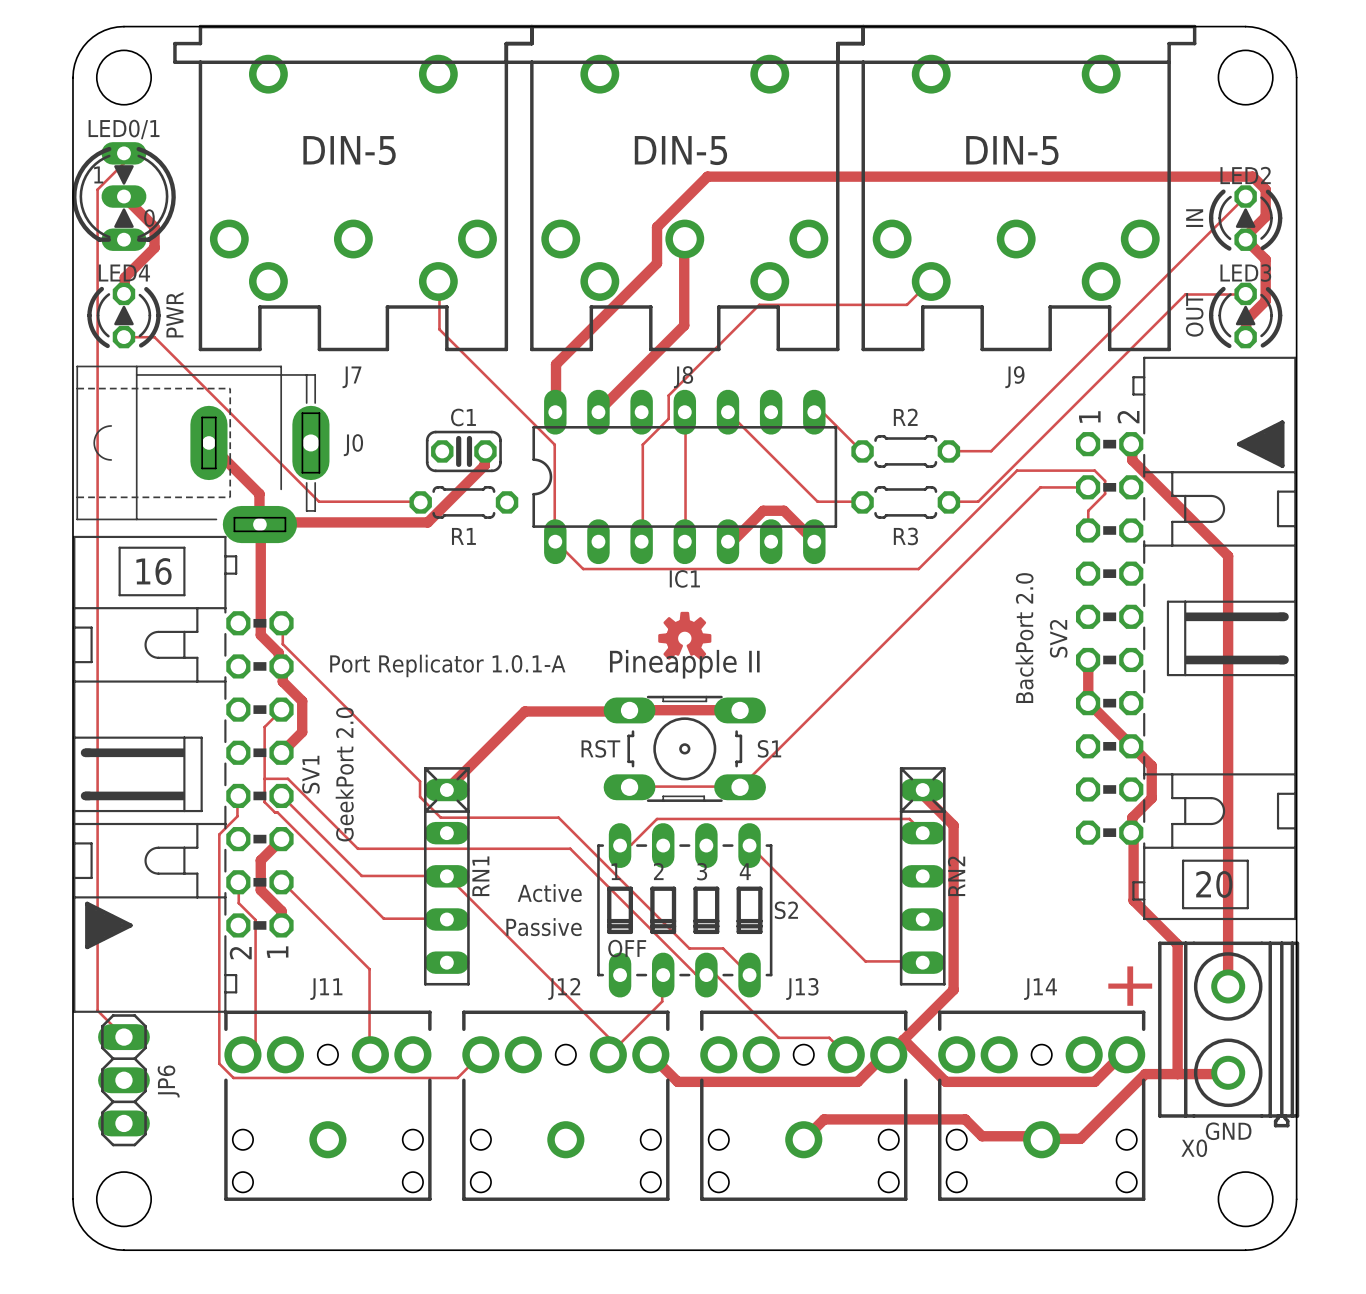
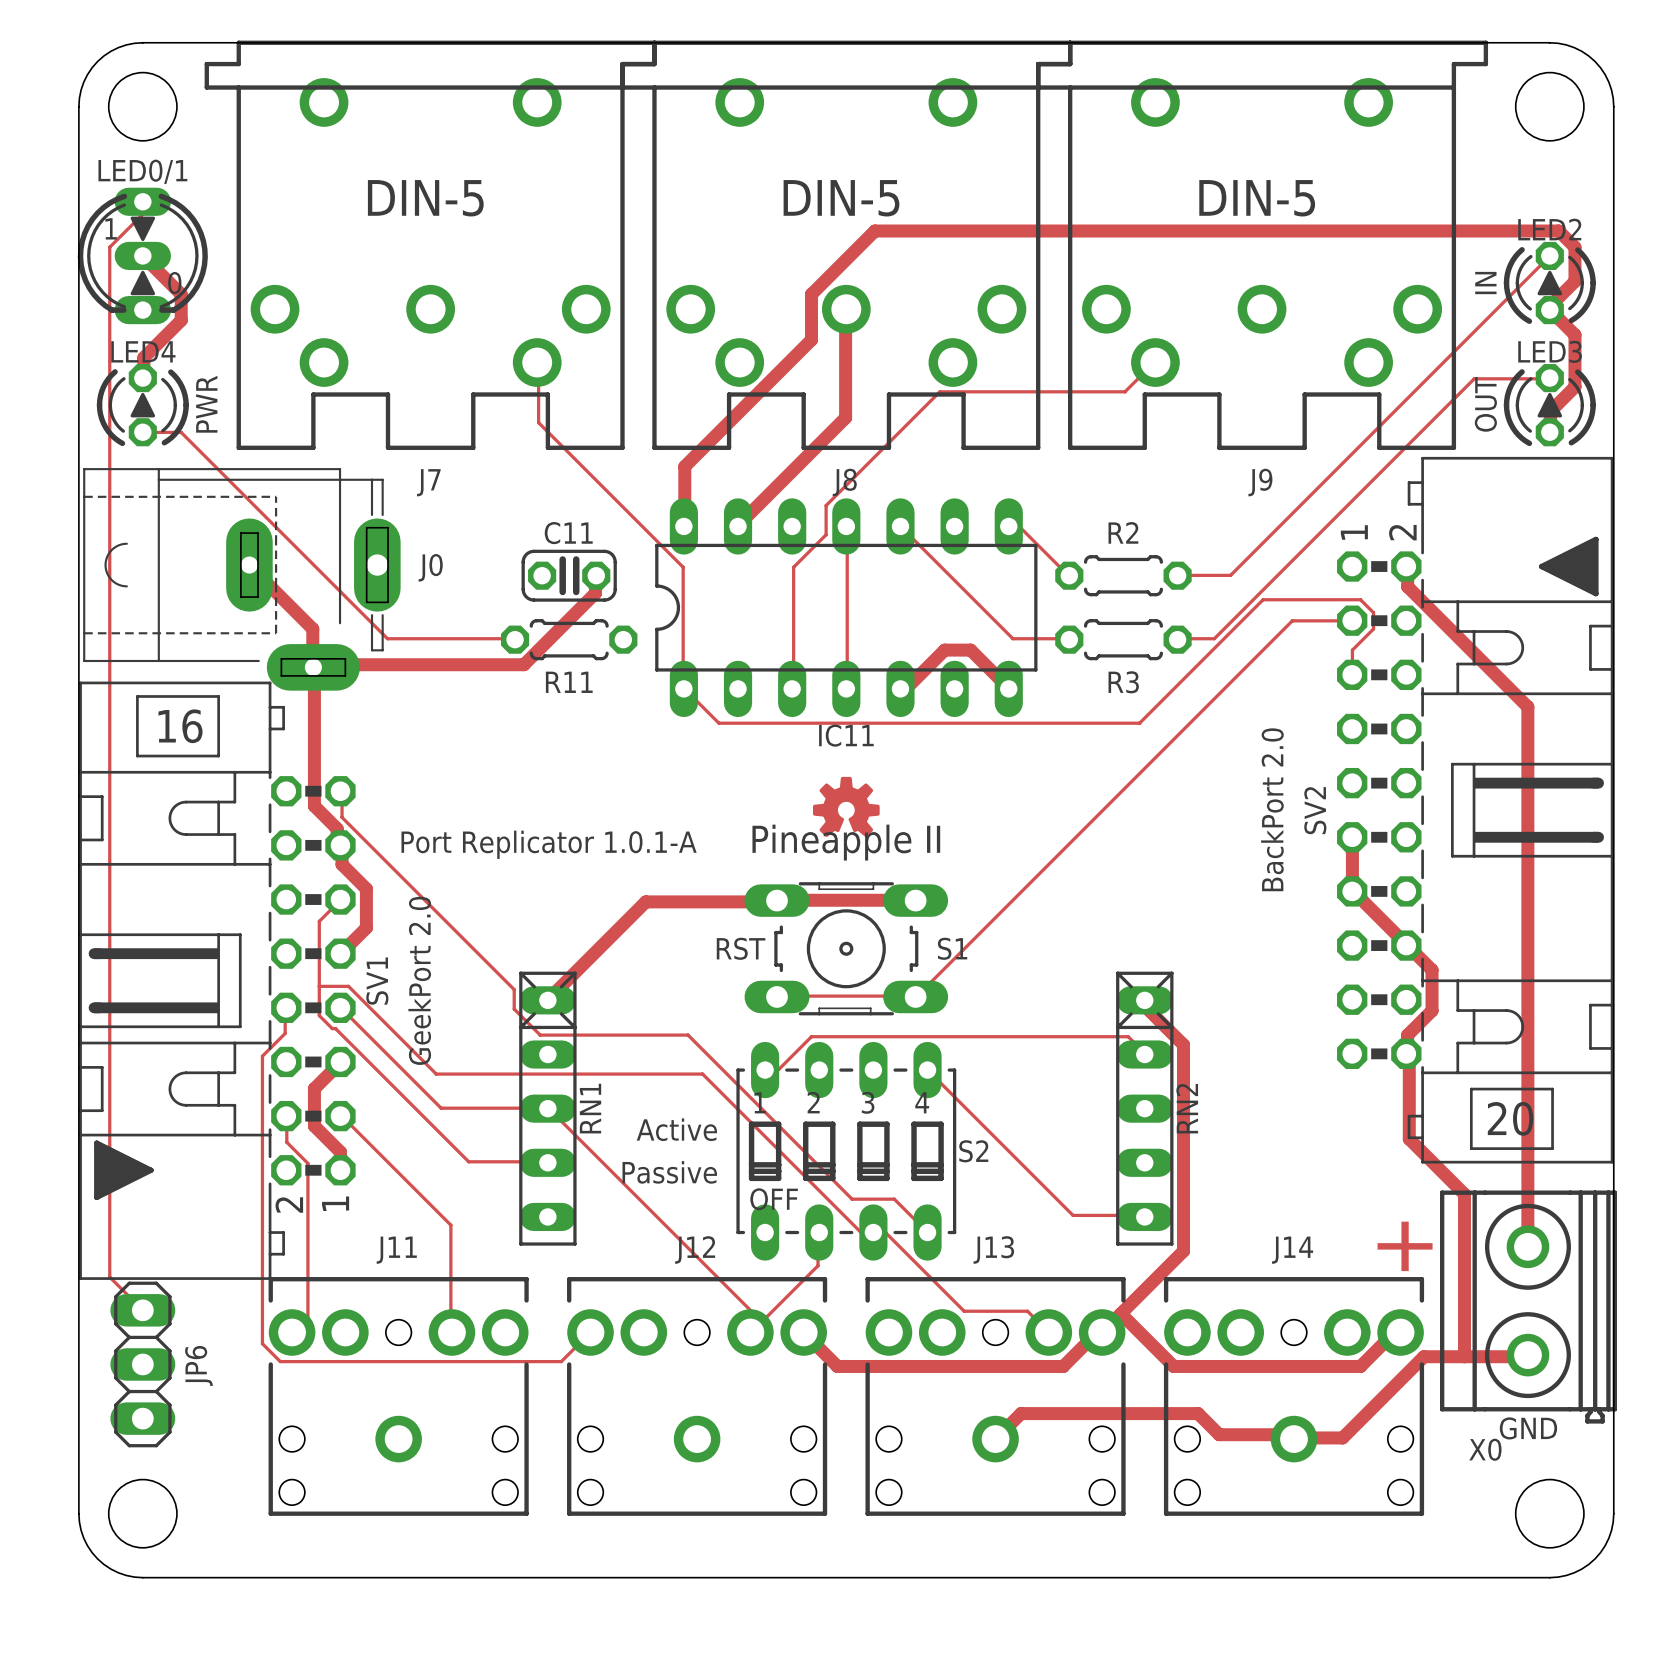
C1 name: C1 (463, 417) -> C11 (568, 533)
R1 name: R1 (463, 536) -> R11 (569, 682)
IC1 name: IC1 (684, 578) -> IC11 (846, 735)

